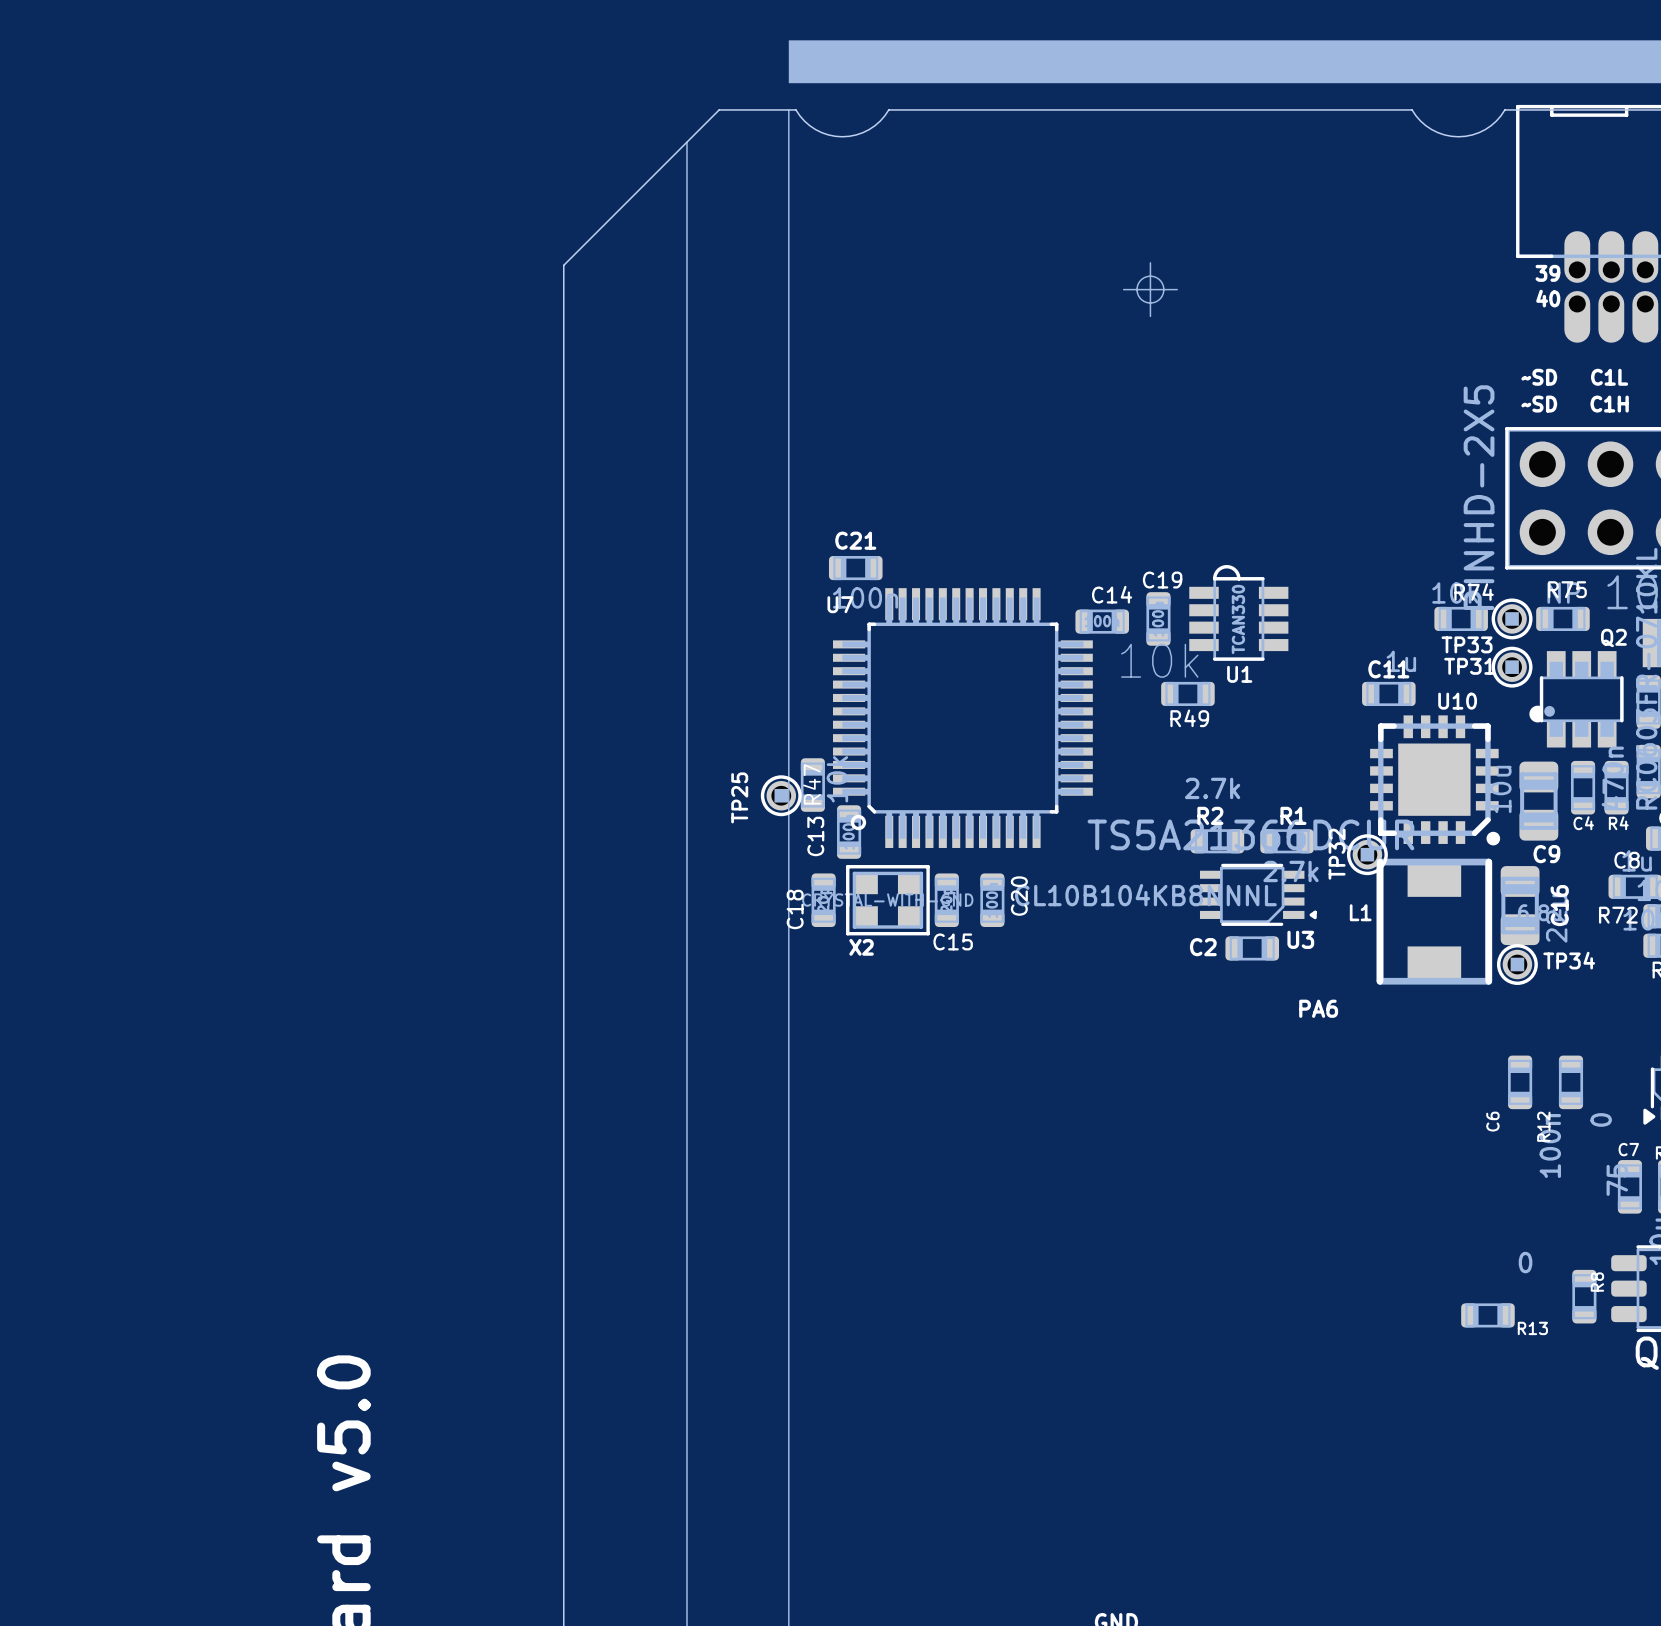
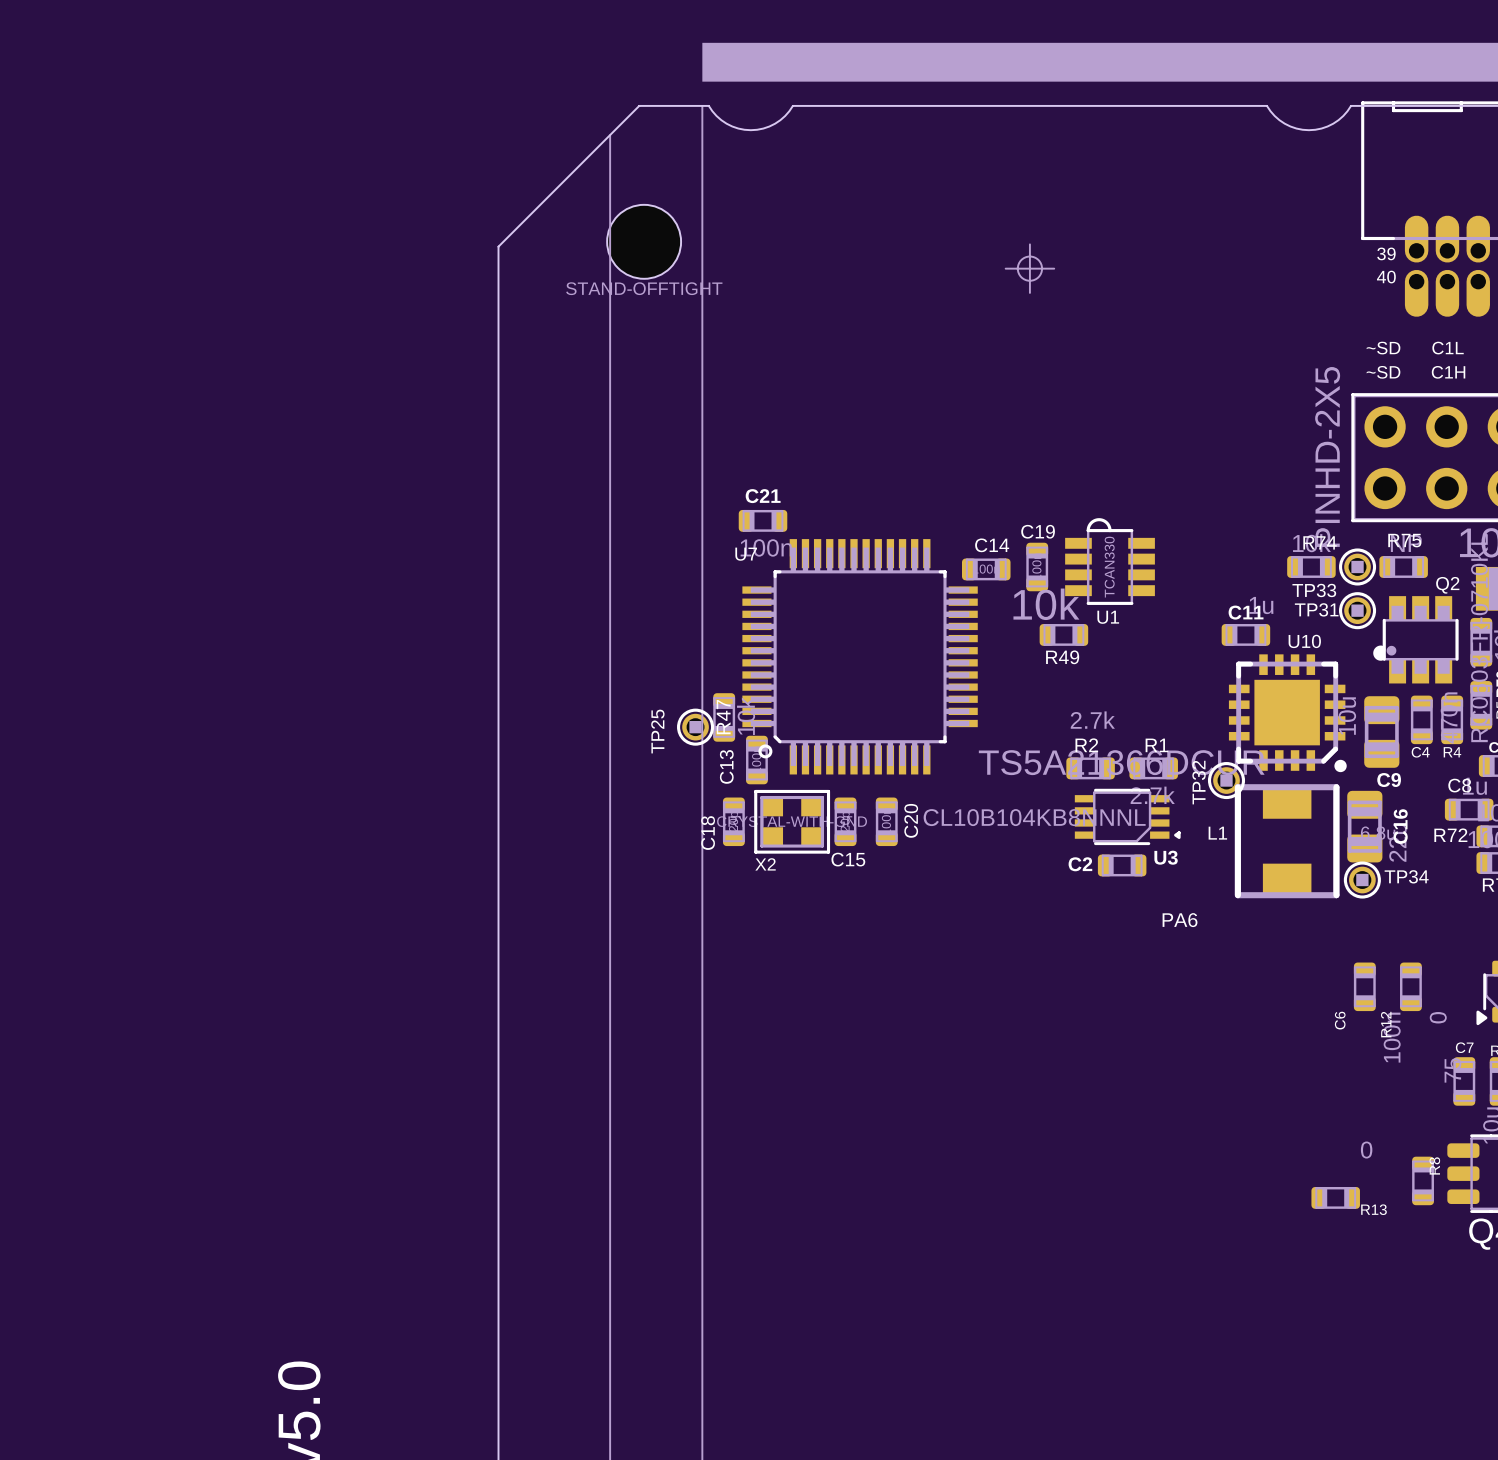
part: none -> STAND-OFFTIGHT (644, 241)

